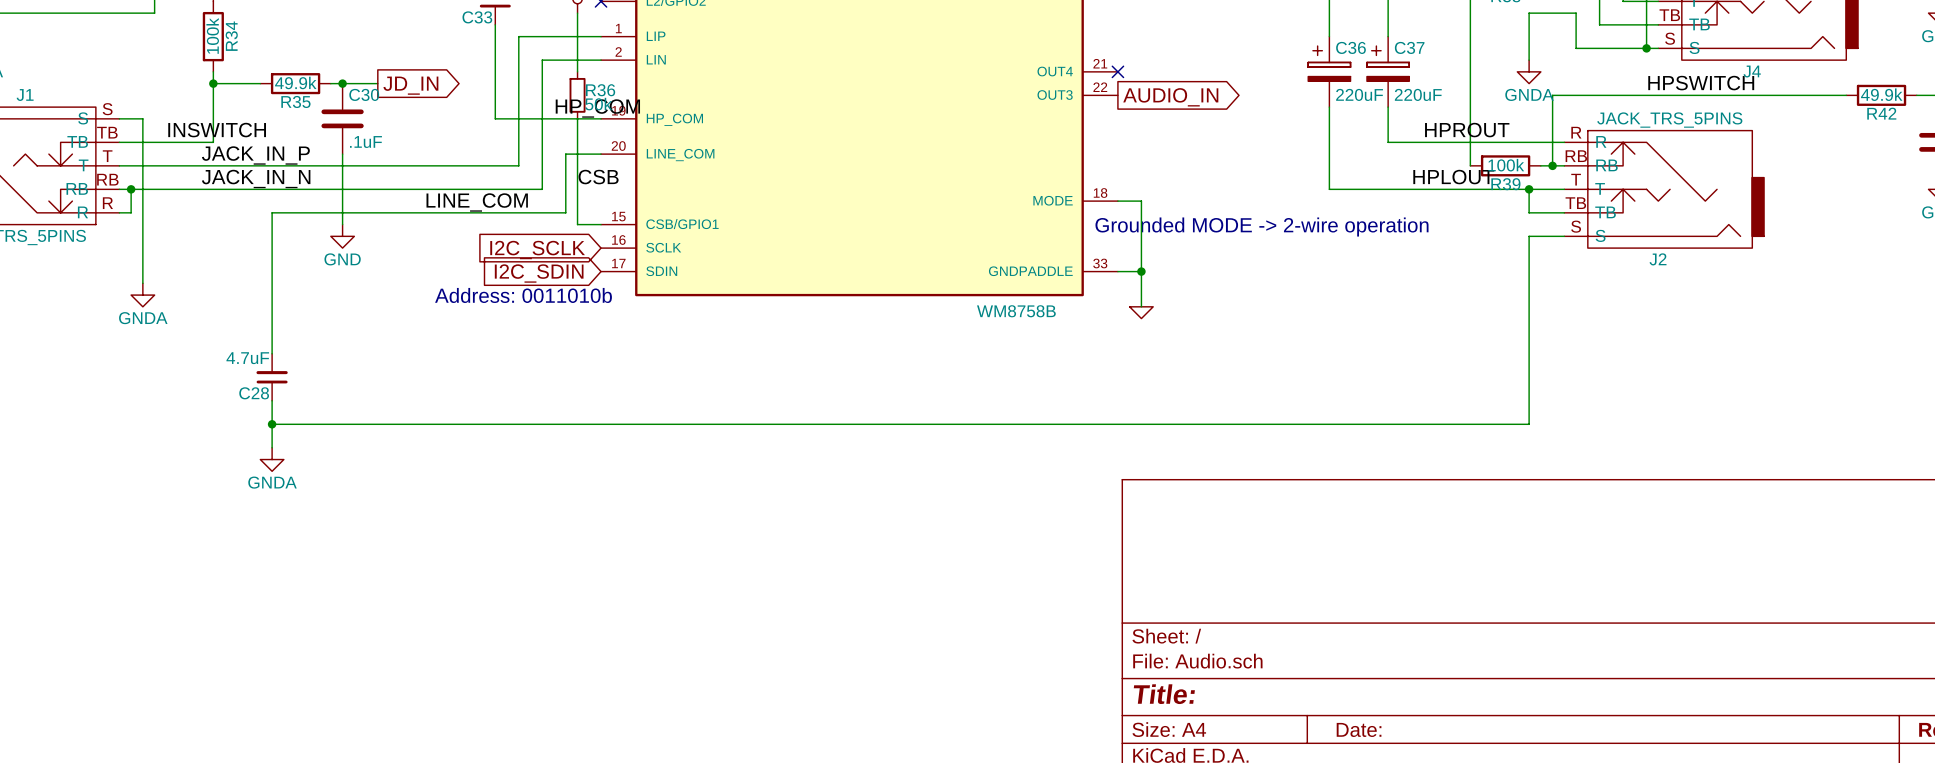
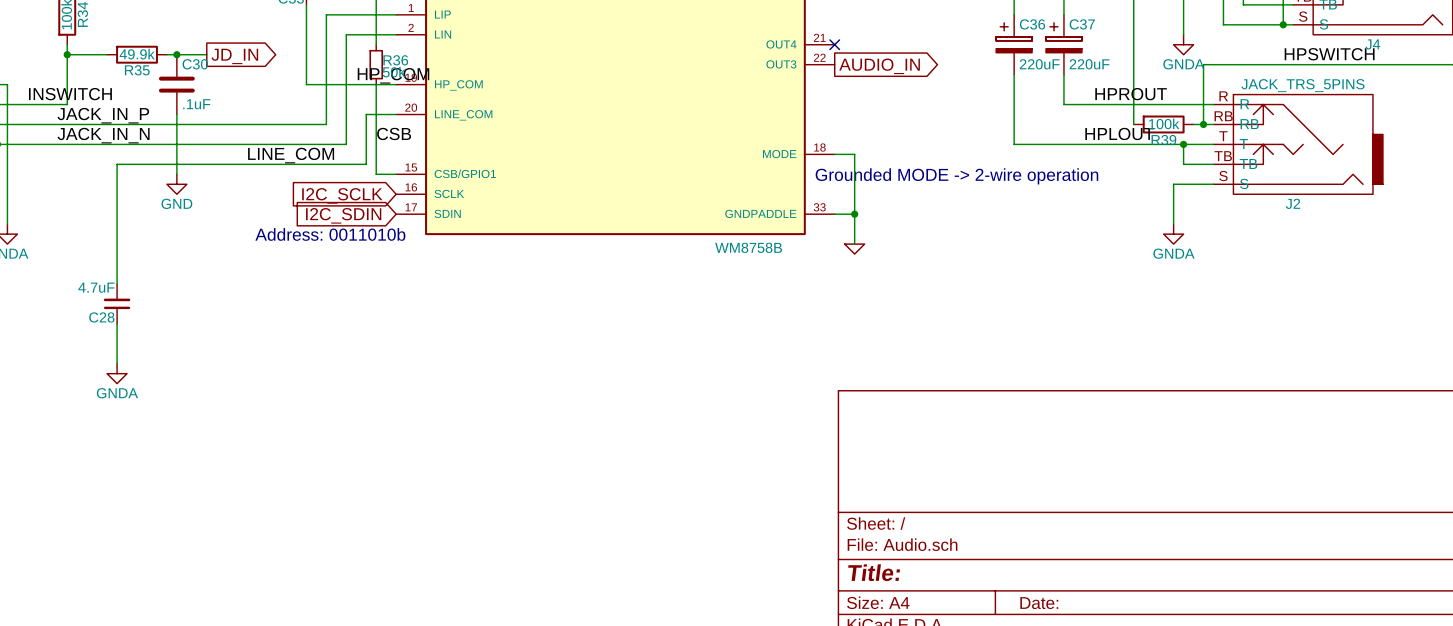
wire: (1529, 236) (1529, 424) (272, 424) -> (1183, 184) (1173, 184) (1173, 224)
power symbol: none -> GNDA (1173, 234)
junction: (272, 424) -> none

